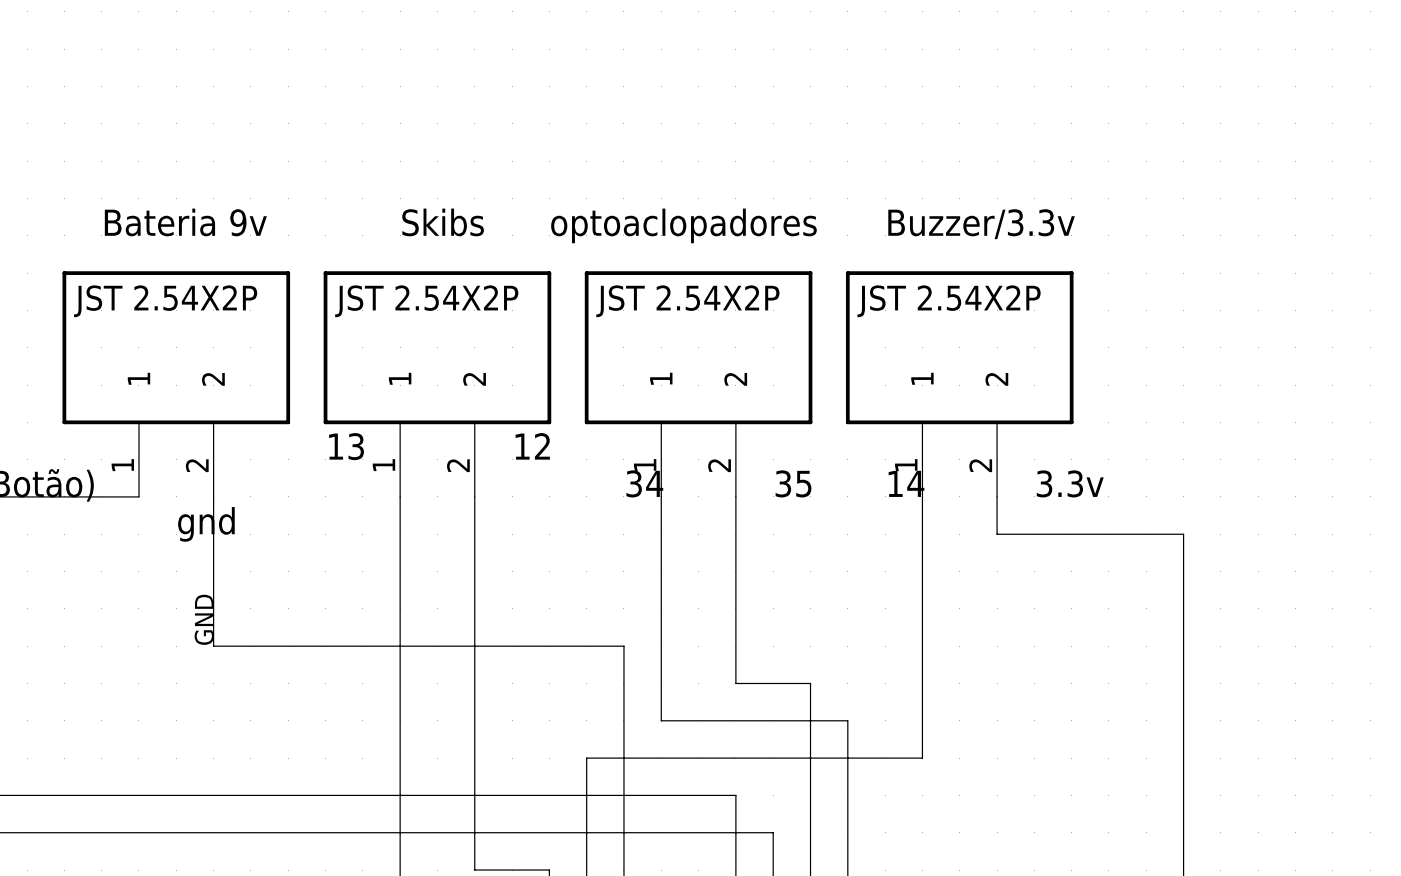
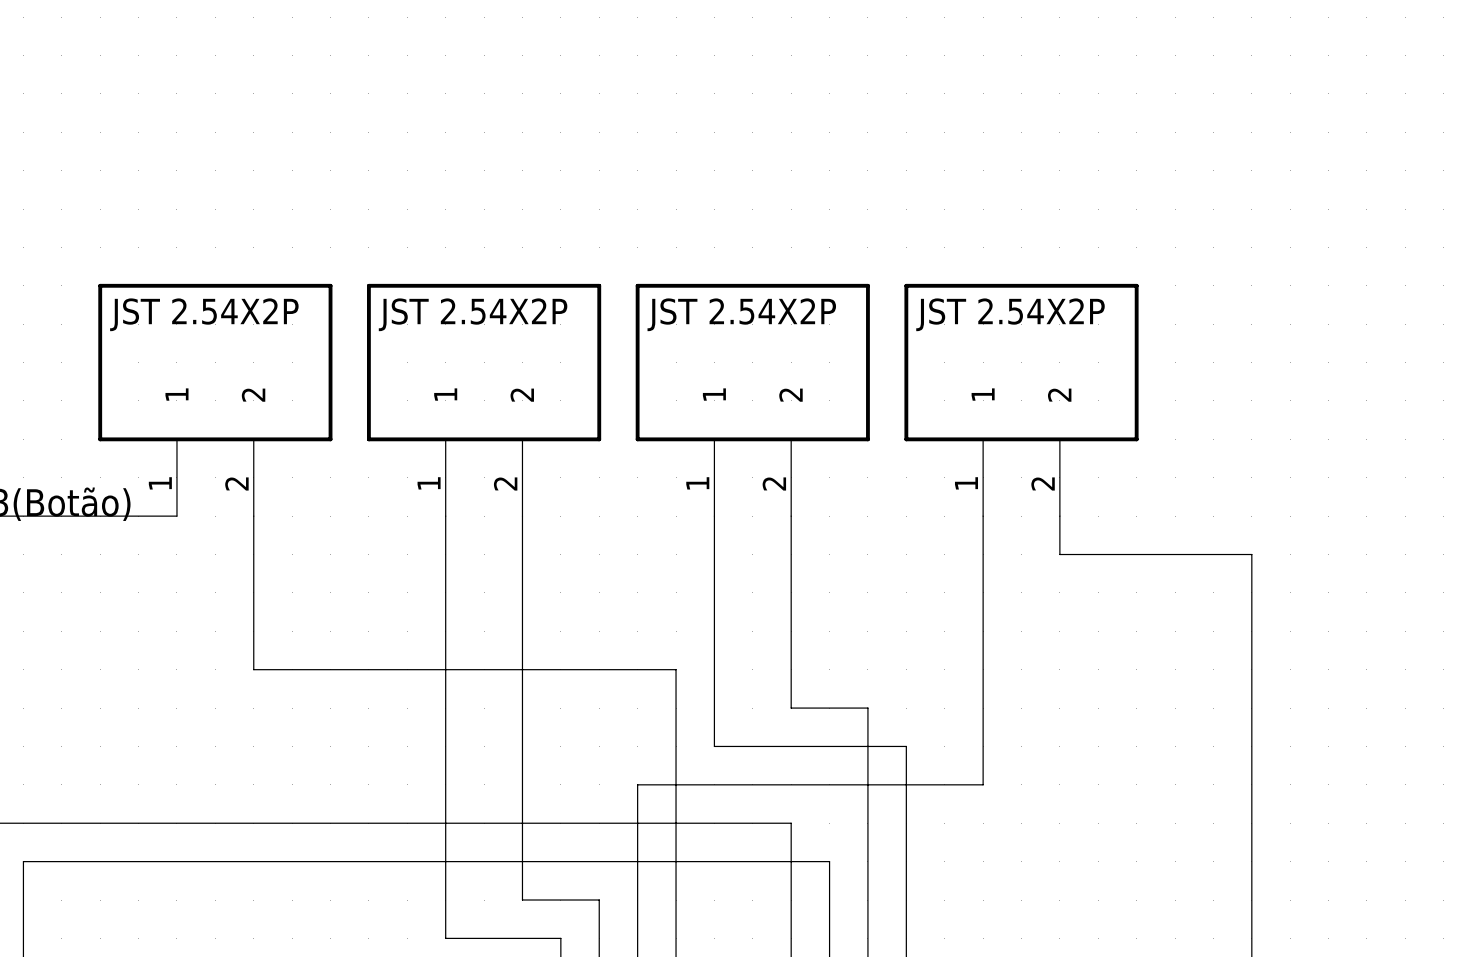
text: Bateria 9v (185, 222) -> none
text: Skibs (443, 222) -> none
text: Buzzer/3.3v (981, 224) -> none
text: optoaclopadores (683, 225) -> none
text: 13 (346, 446) -> none
text: 12 (532, 446) -> none
text: 34 (644, 483) -> none
text: 35 (793, 483) -> none
text: 14 (906, 483) -> none
text: 3.3v (1070, 483) -> none
text: gnd (206, 524) -> none
label: GND (204, 619) -> none

